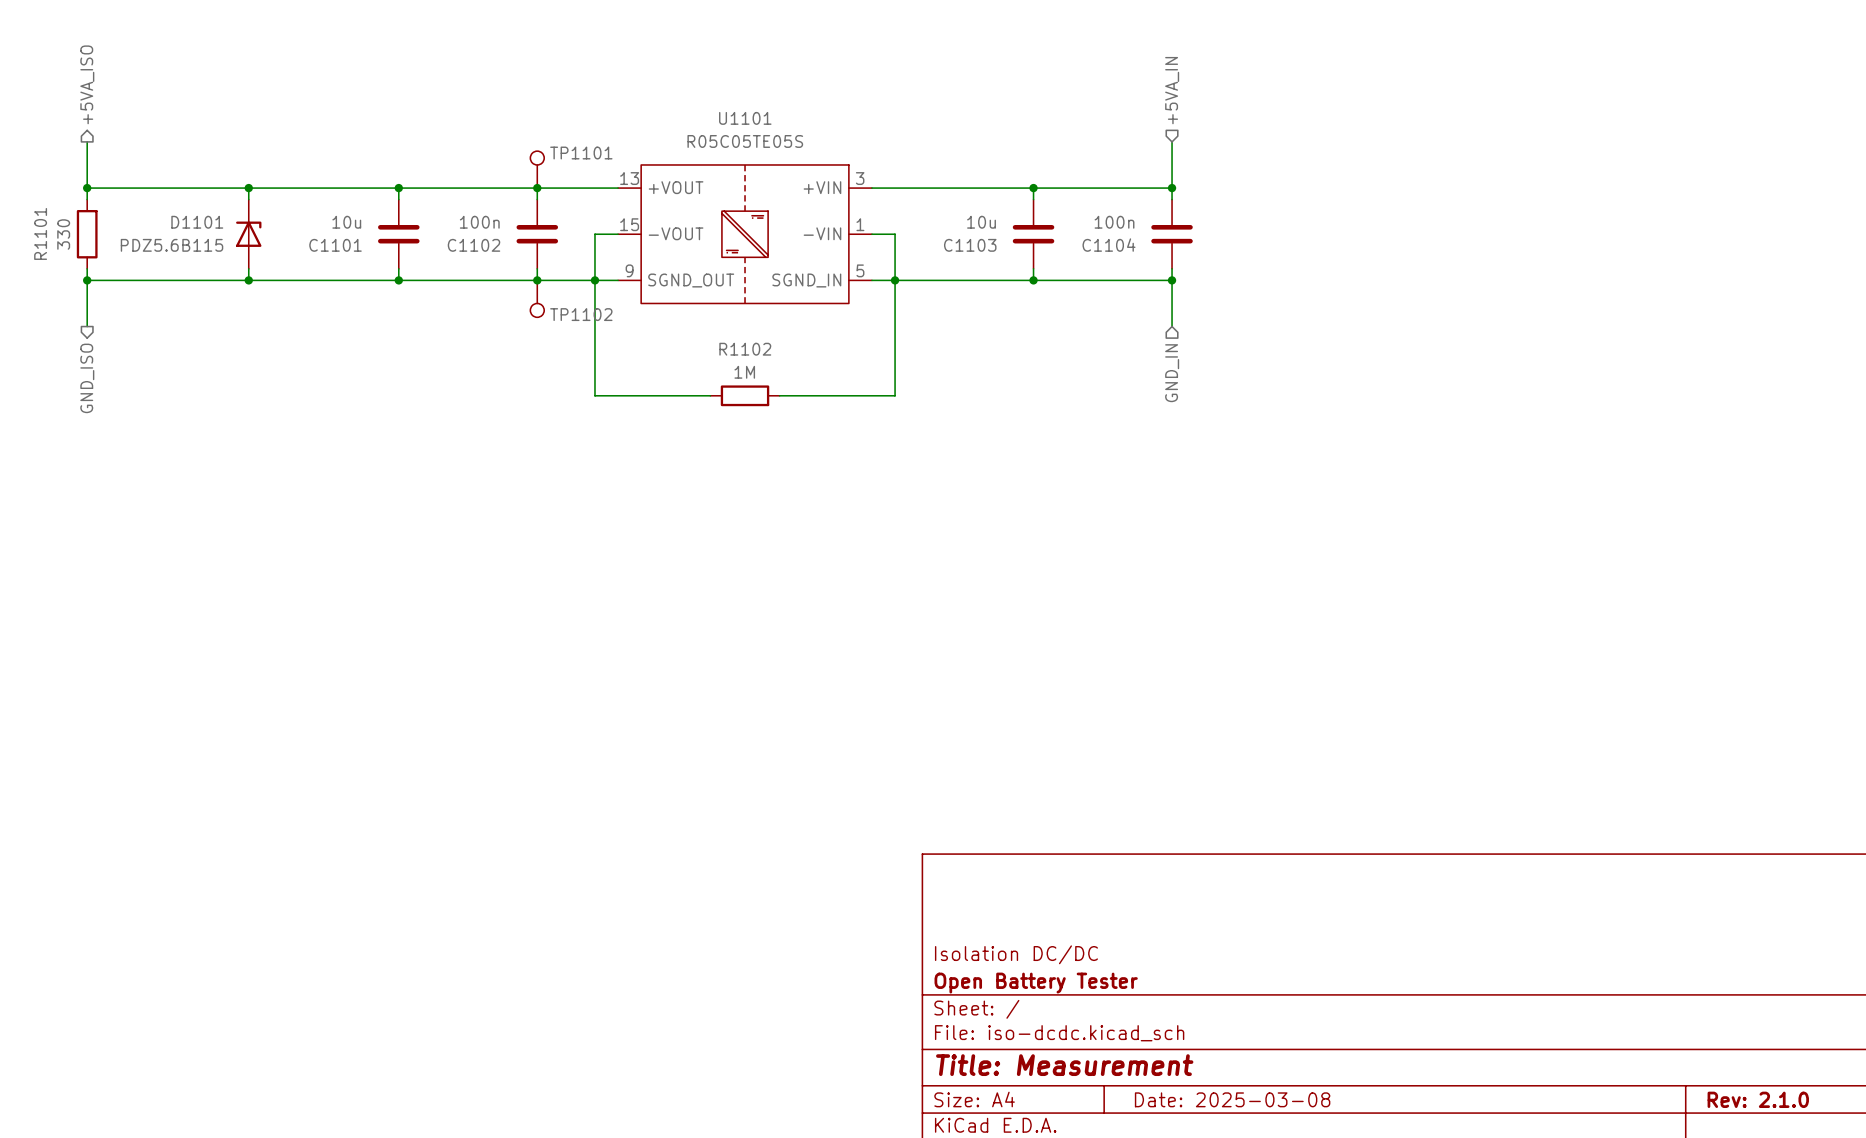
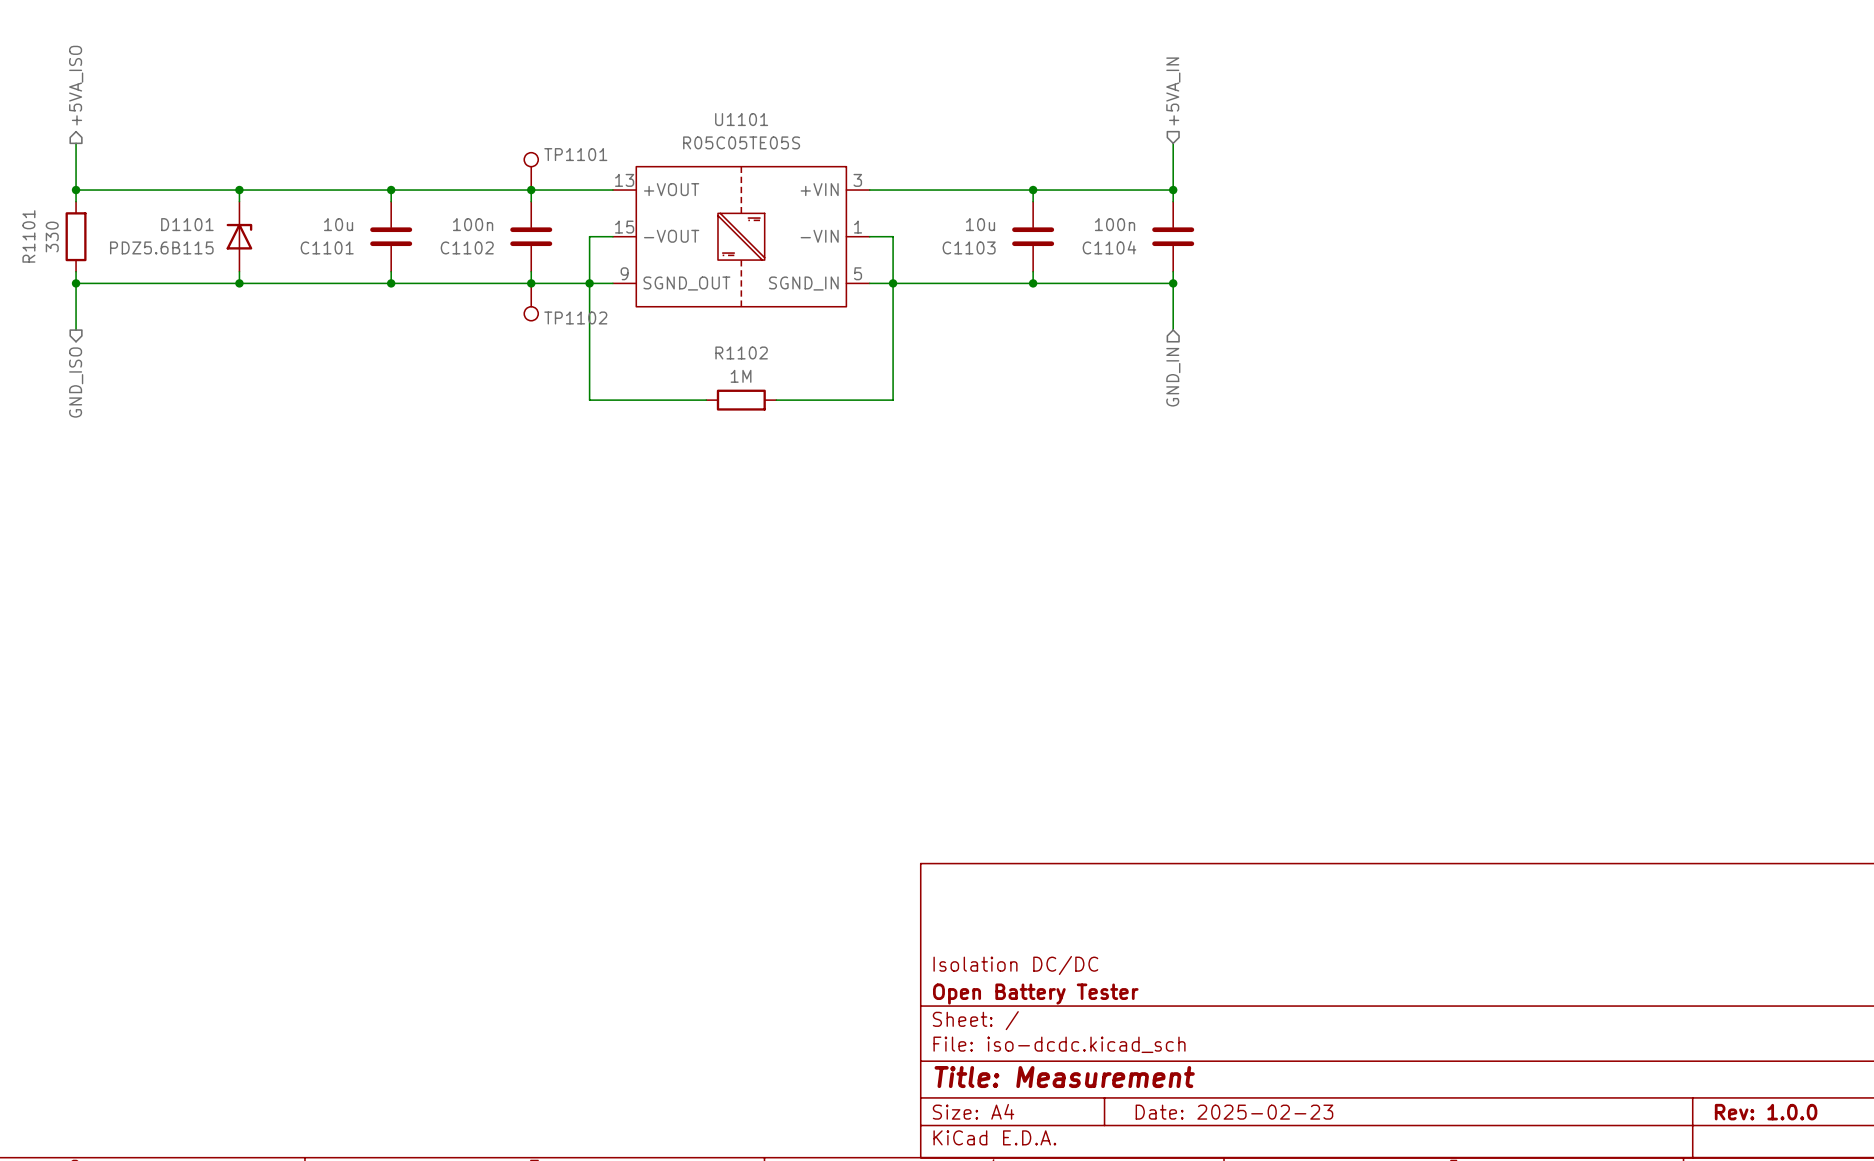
title block: Date: 2025-03-08 (1232, 1099) -> Date: 2025-02-23 (1234, 1112)
title block: Rev: 2.1.0 (1758, 1099) -> Rev: 1.0.0 (1766, 1112)

